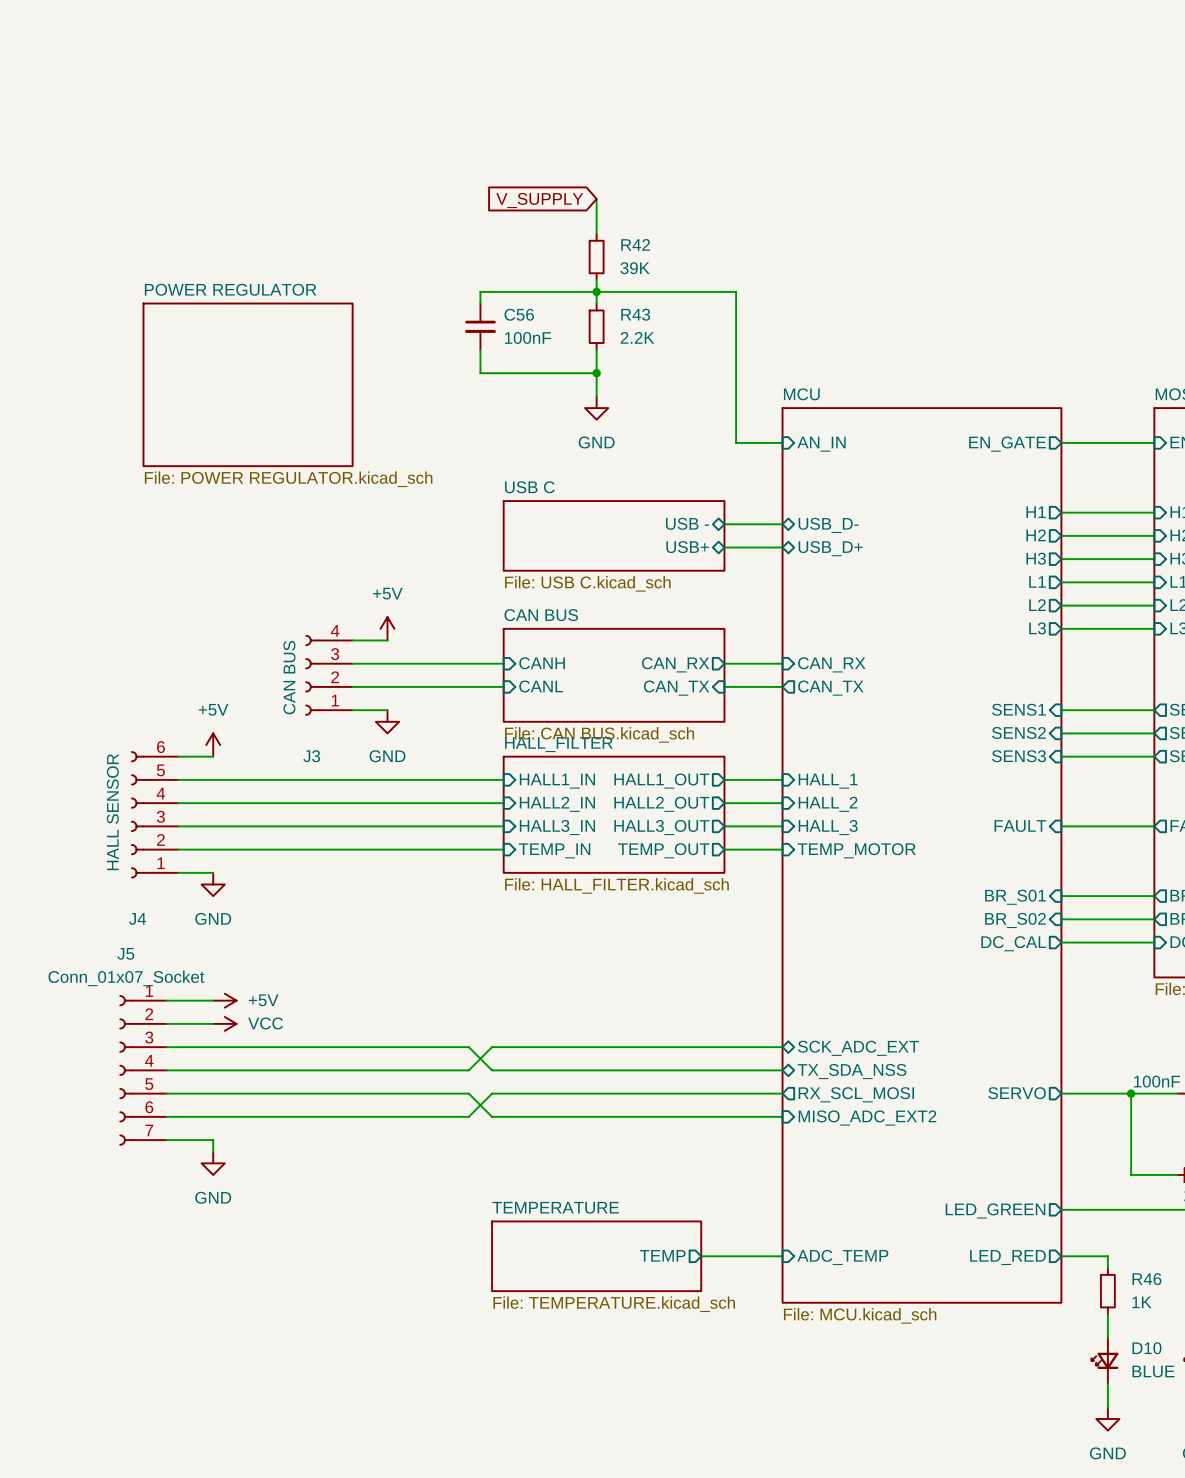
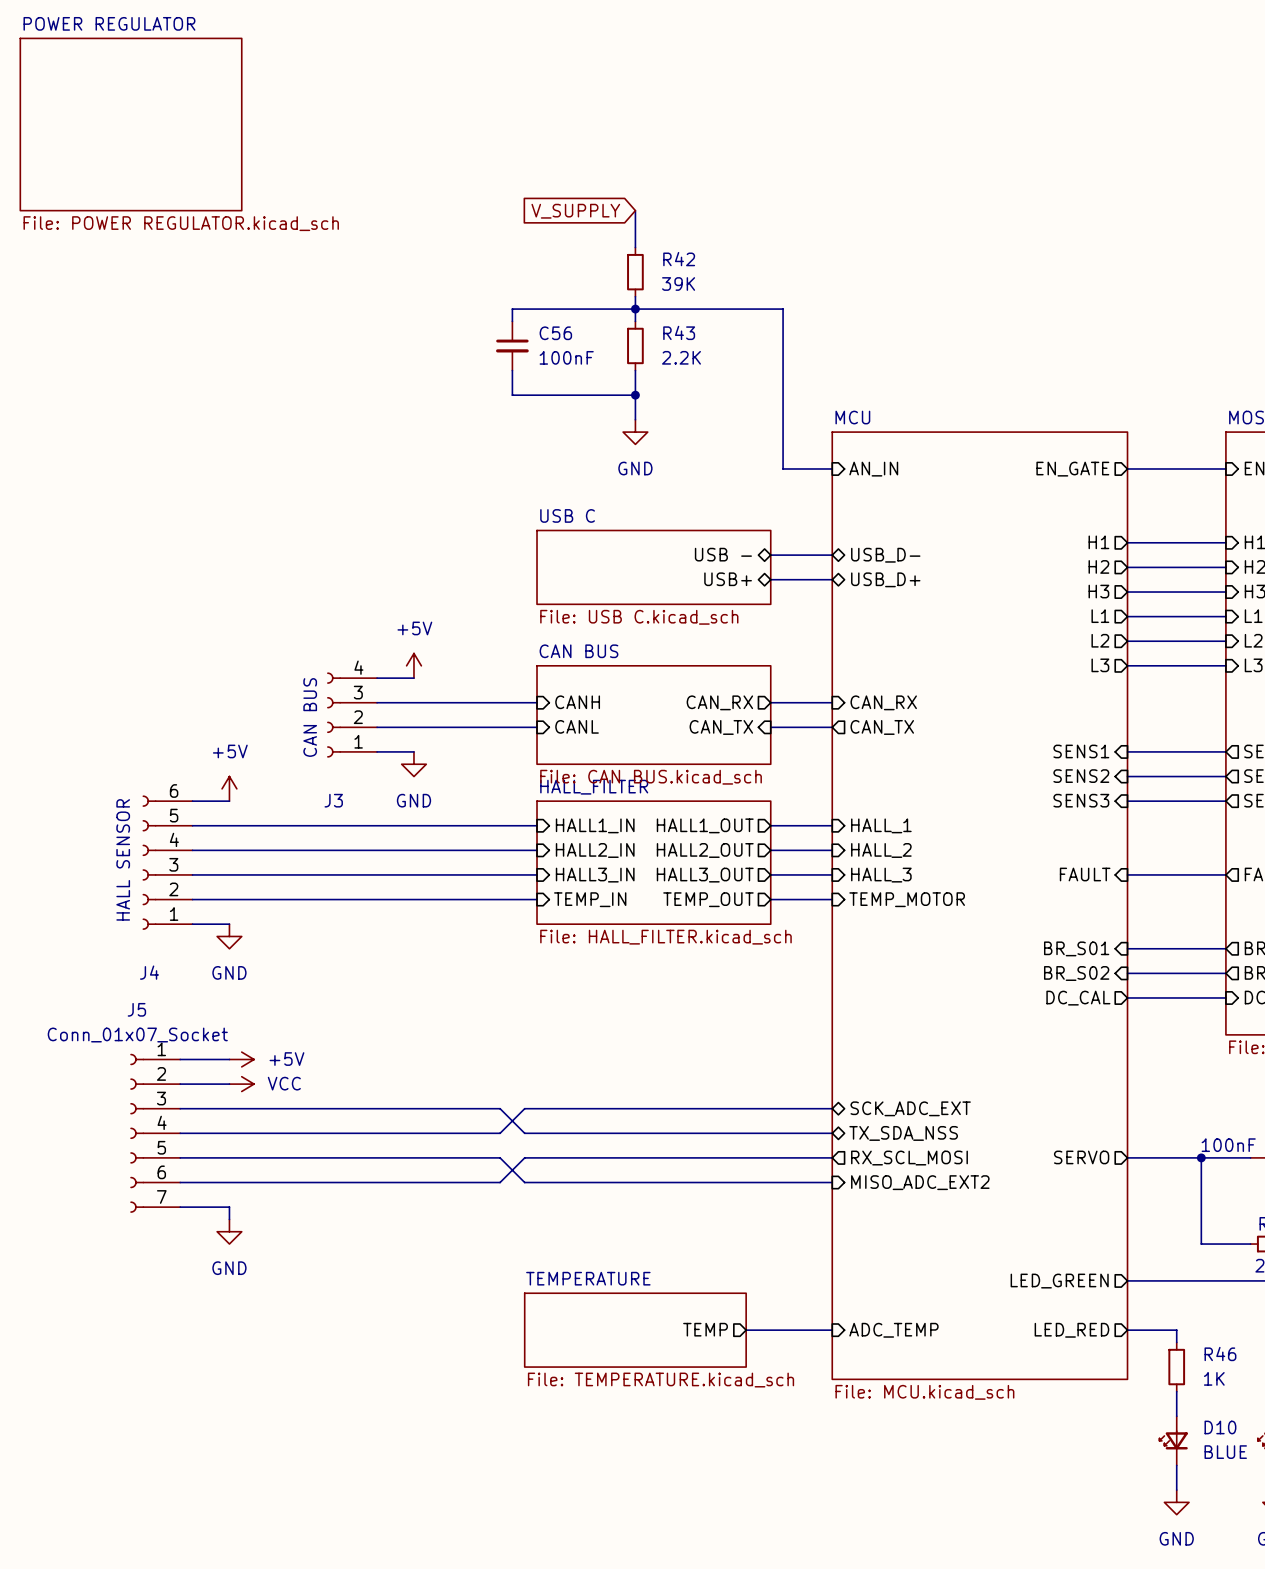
sheet POWER REGULATOR: none -> File: POWER REGULATOR.kicad_sch (131, 124)
sheet POWER REGULATOR: File: POWER REGULATOR.kicad_sch (248, 384) -> none

